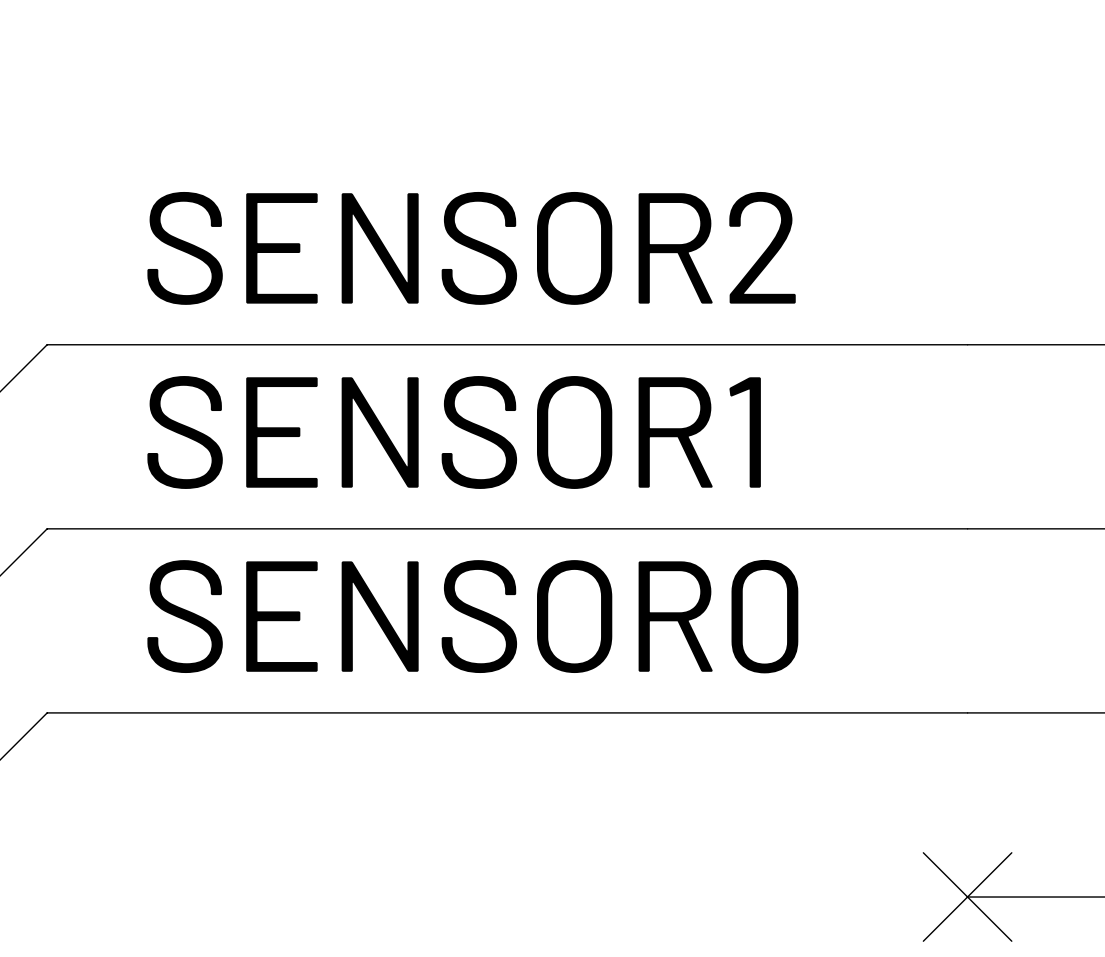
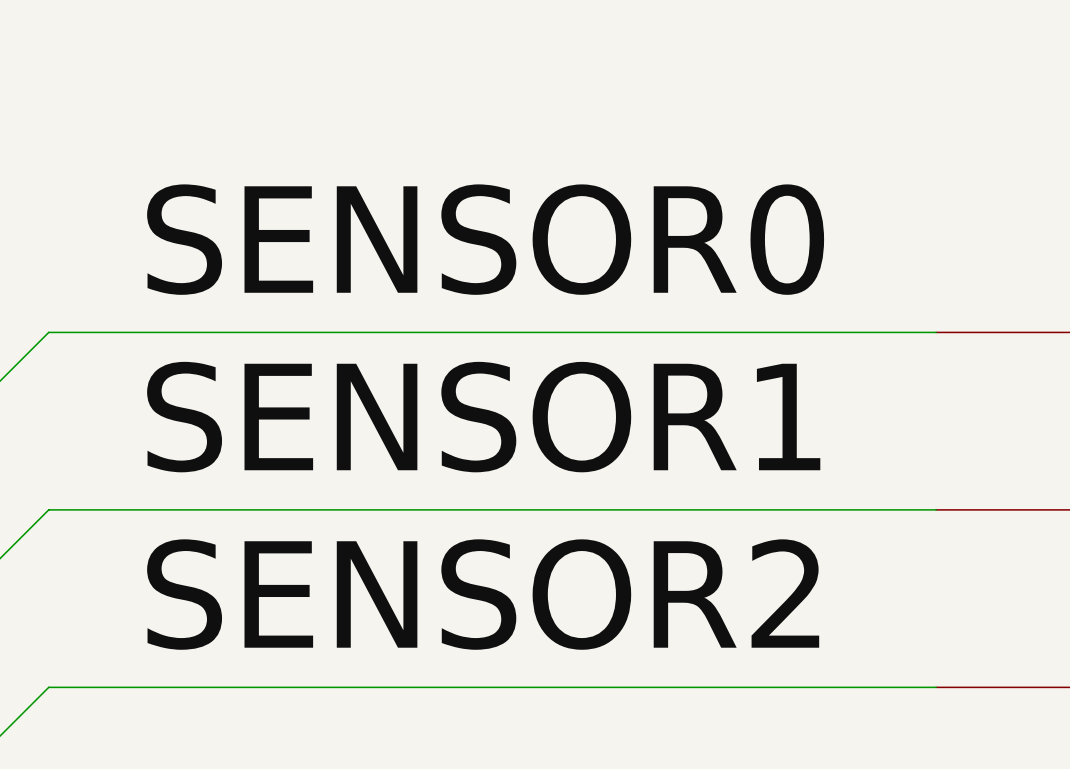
label: SENSOR2 (471, 248) -> SENSOR0 (485, 239)
label: SENSOR0 (472, 616) -> SENSOR2 (483, 594)

